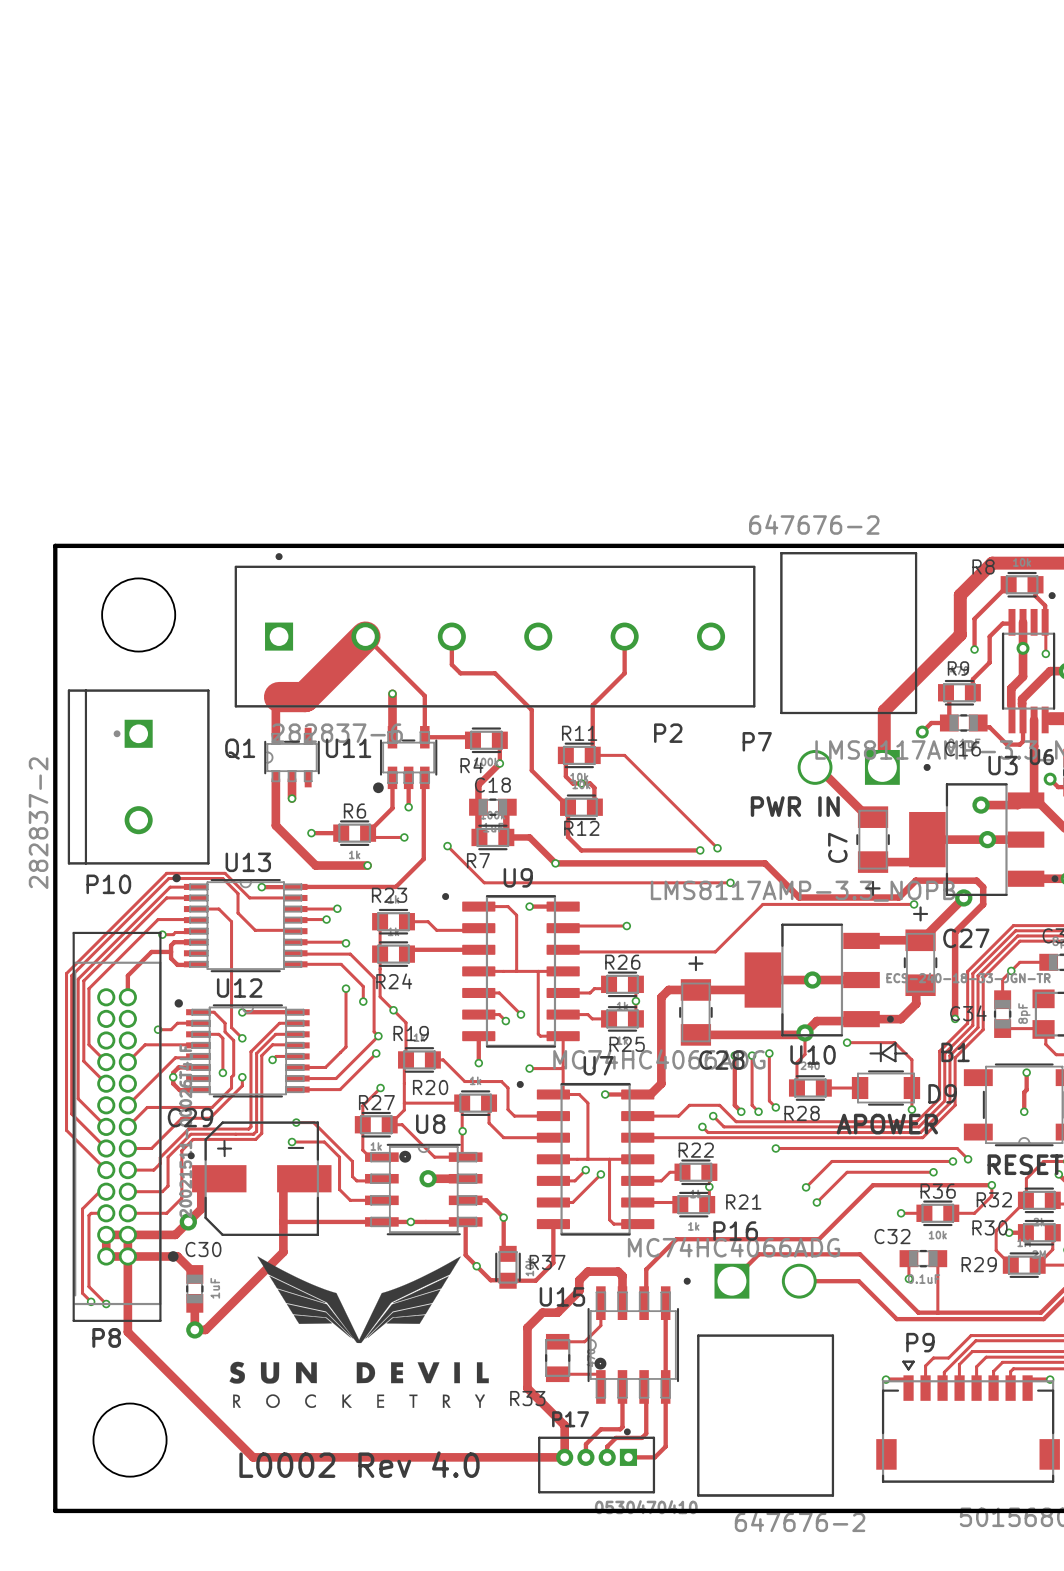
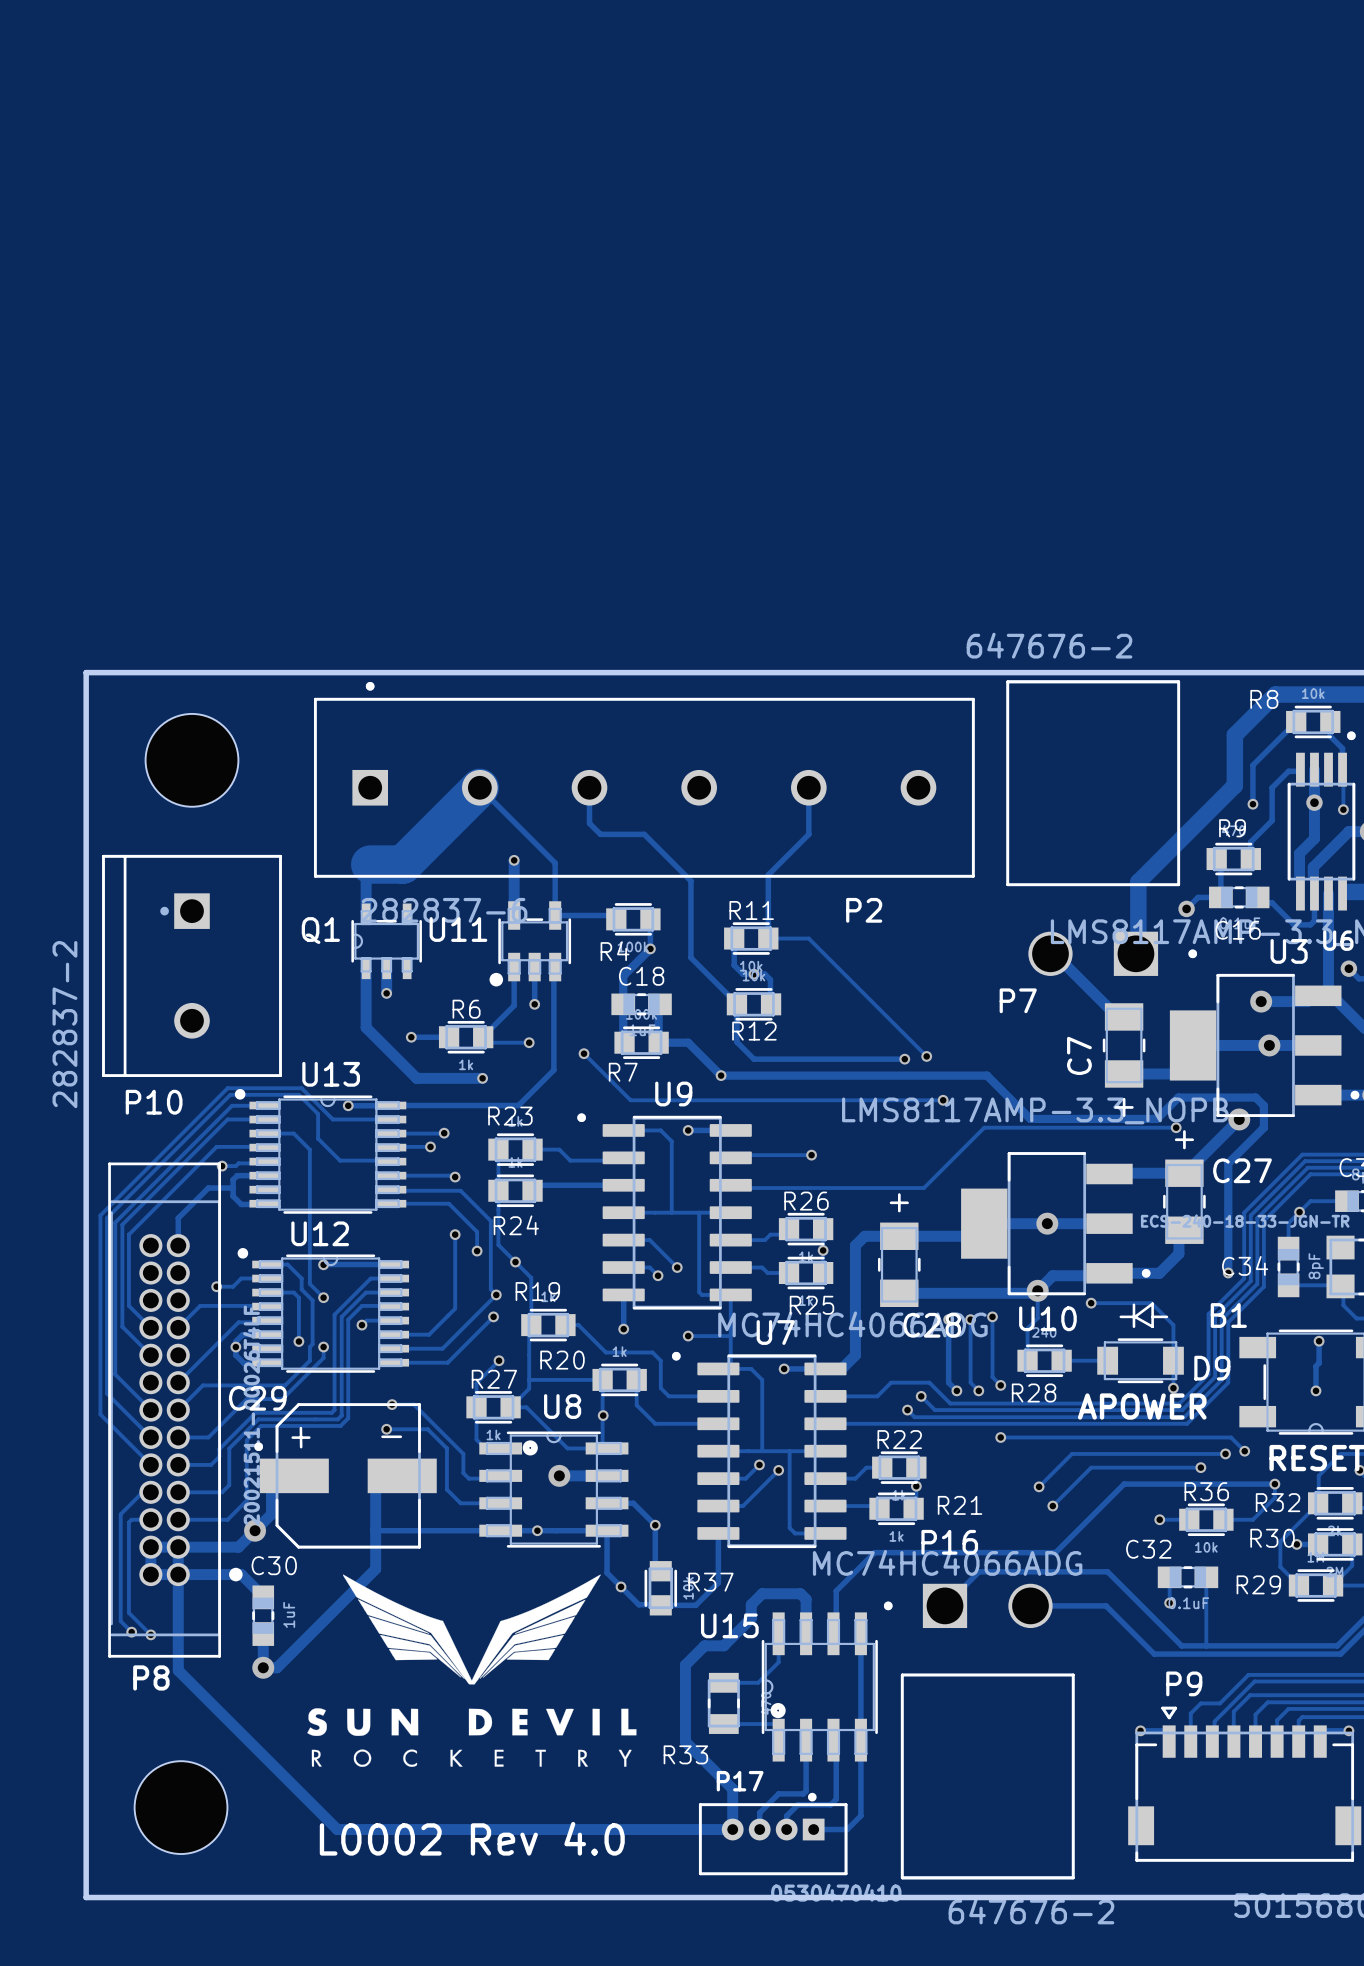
P7 name position: P7 (757, 741) -> P7 (1018, 1000)
text: PWR IN (795, 806) -> none

